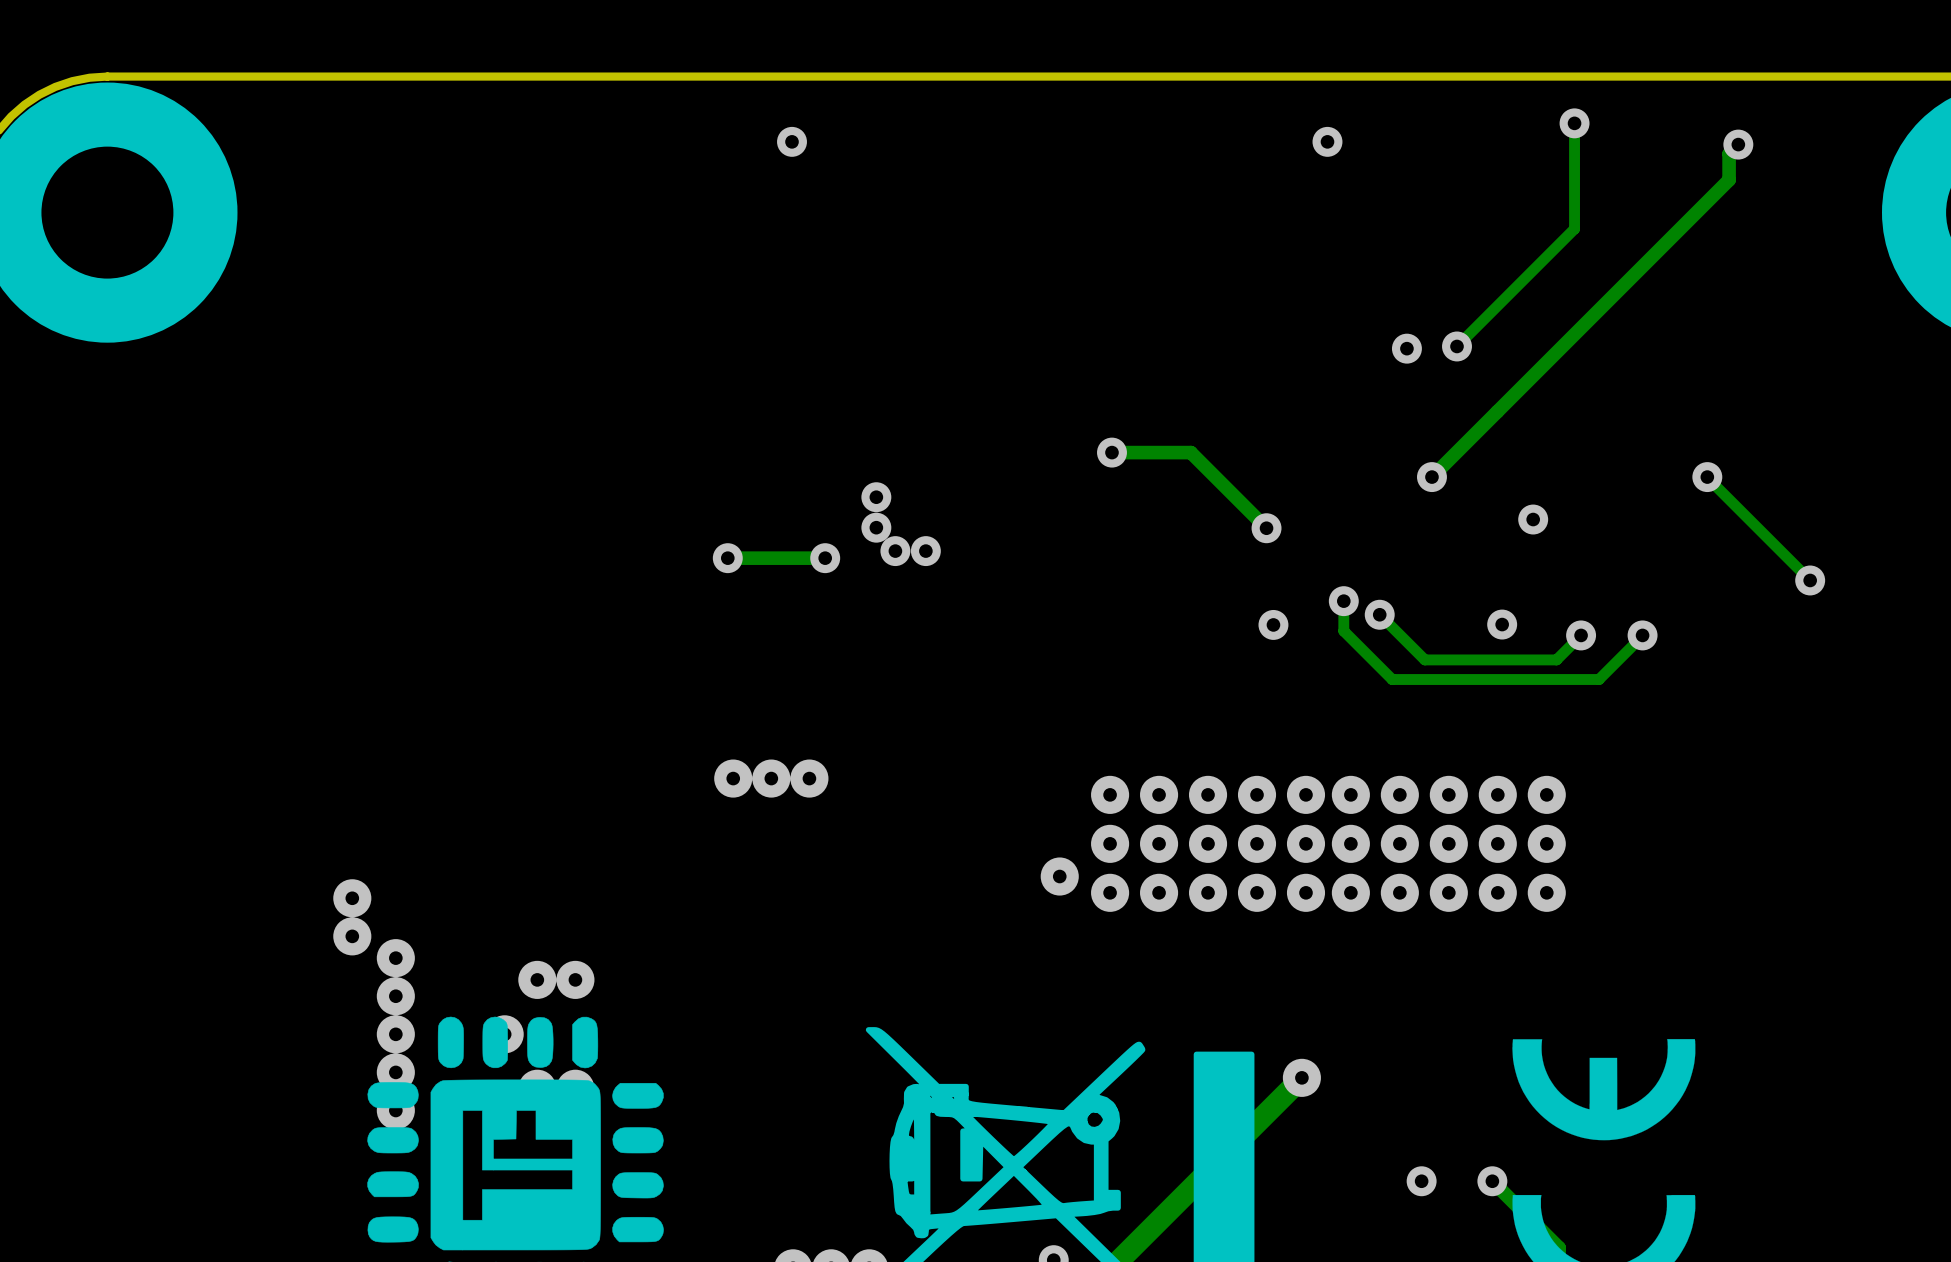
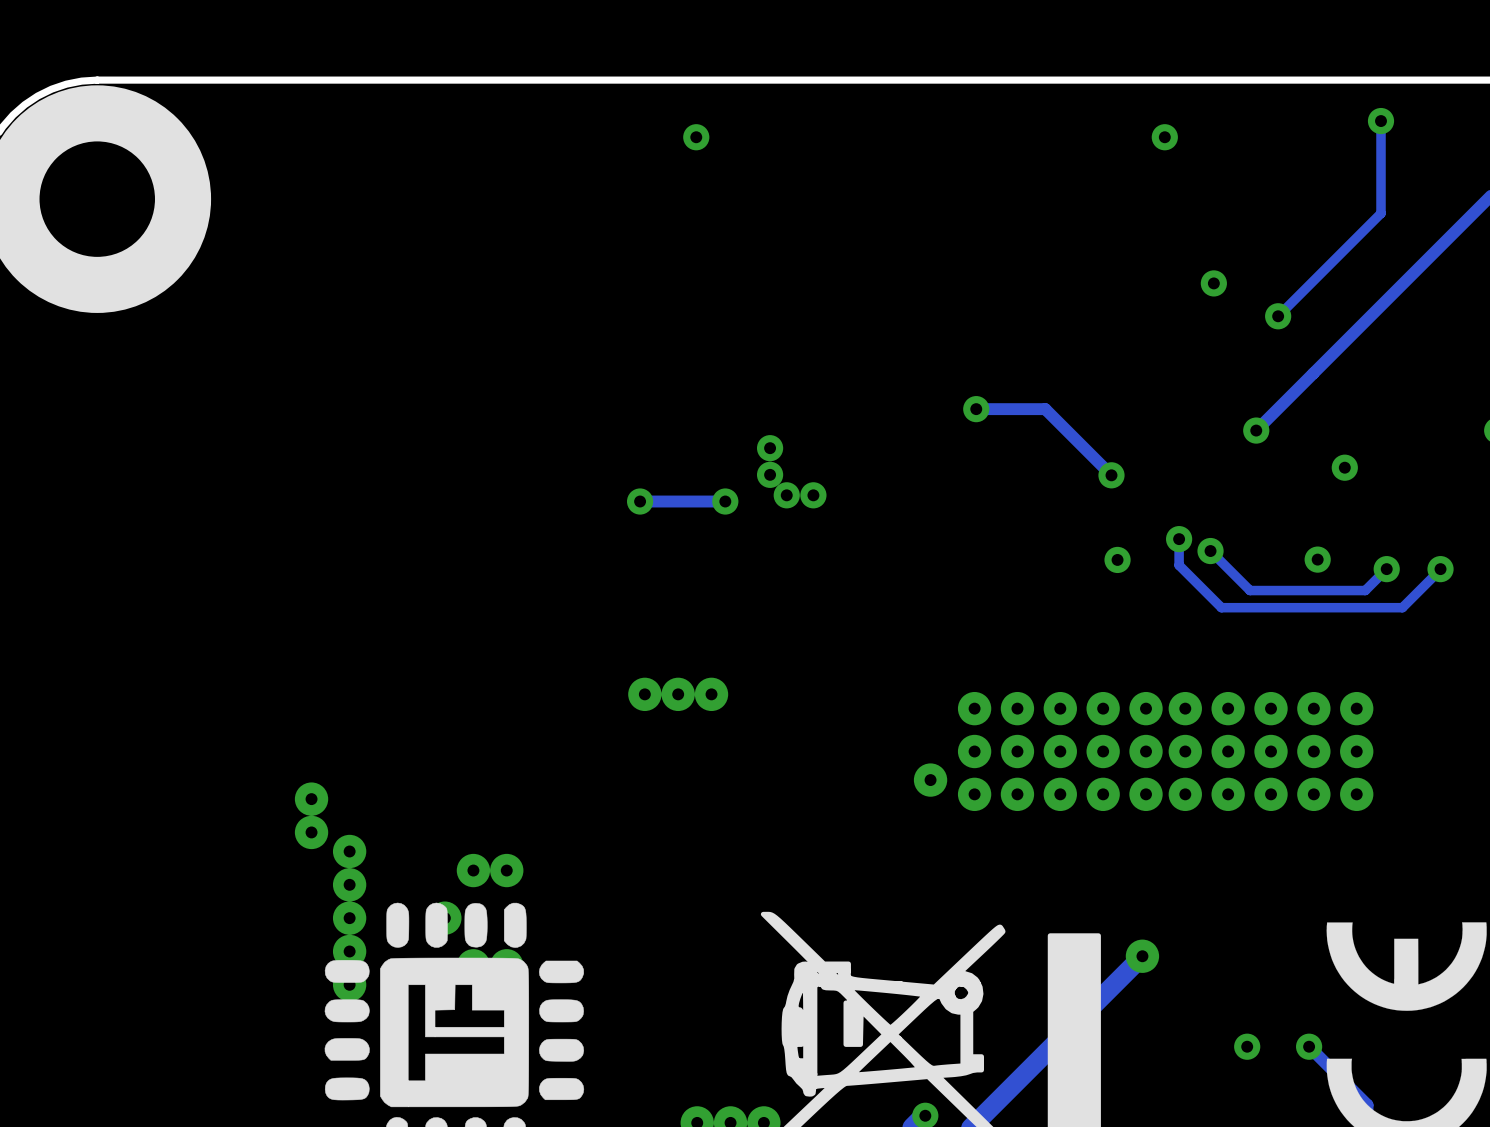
via position: (1406, 348) -> (1213, 283)

